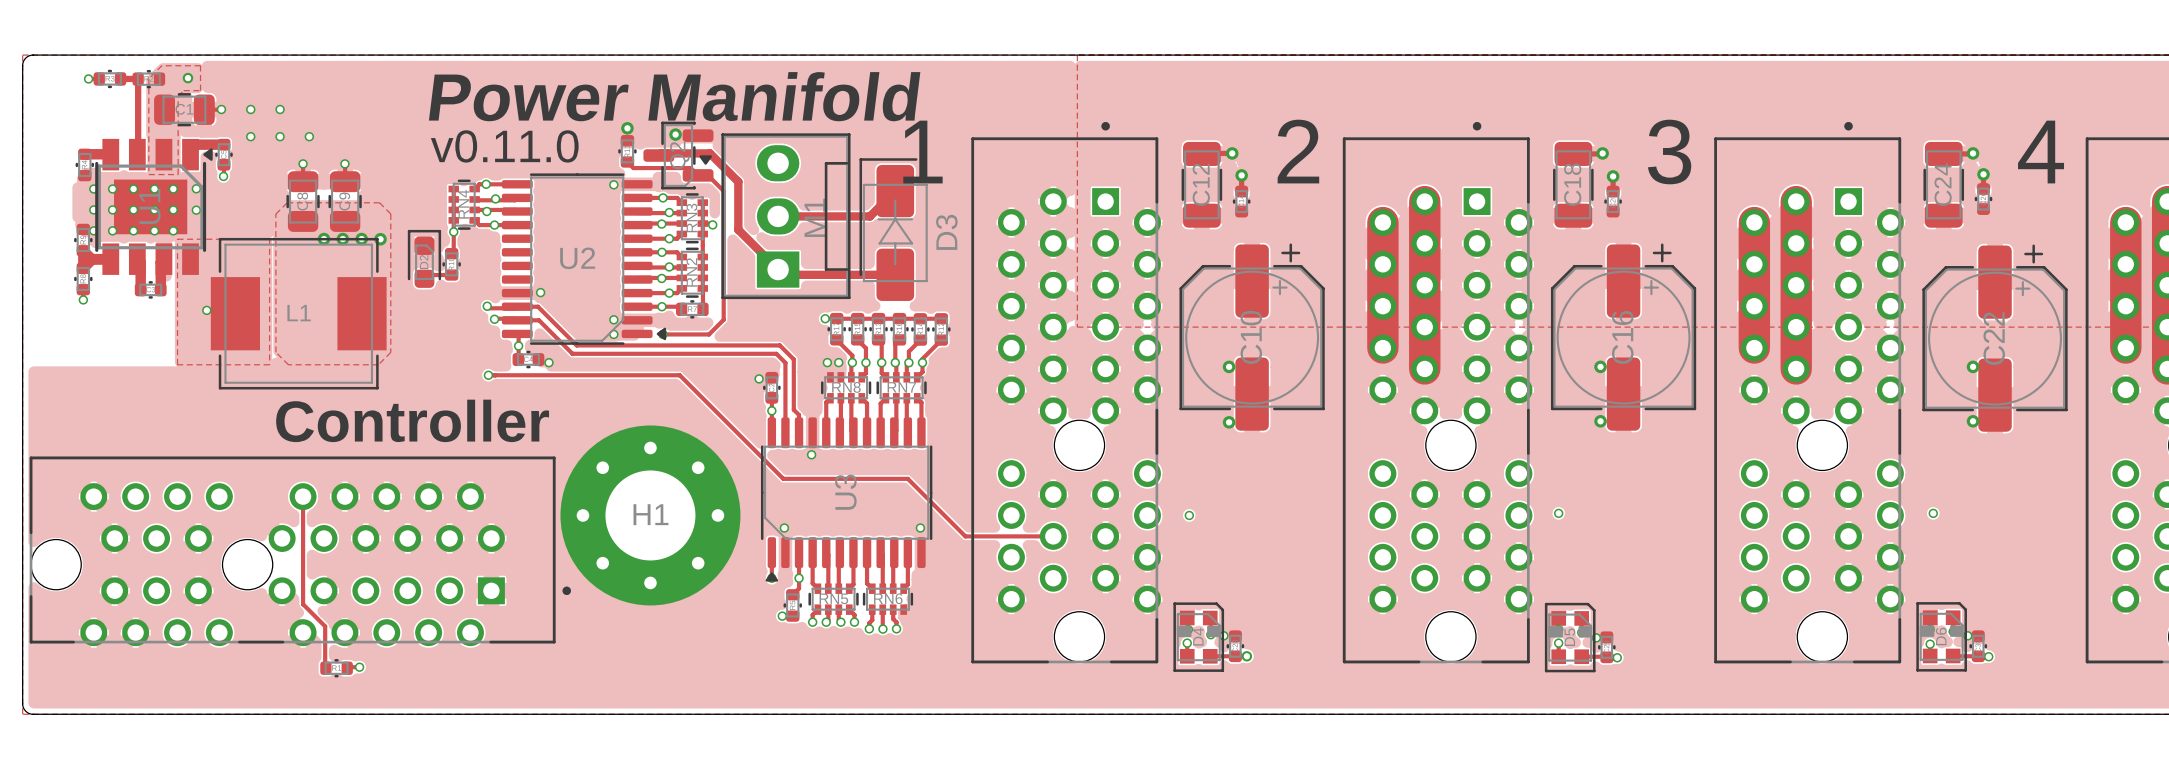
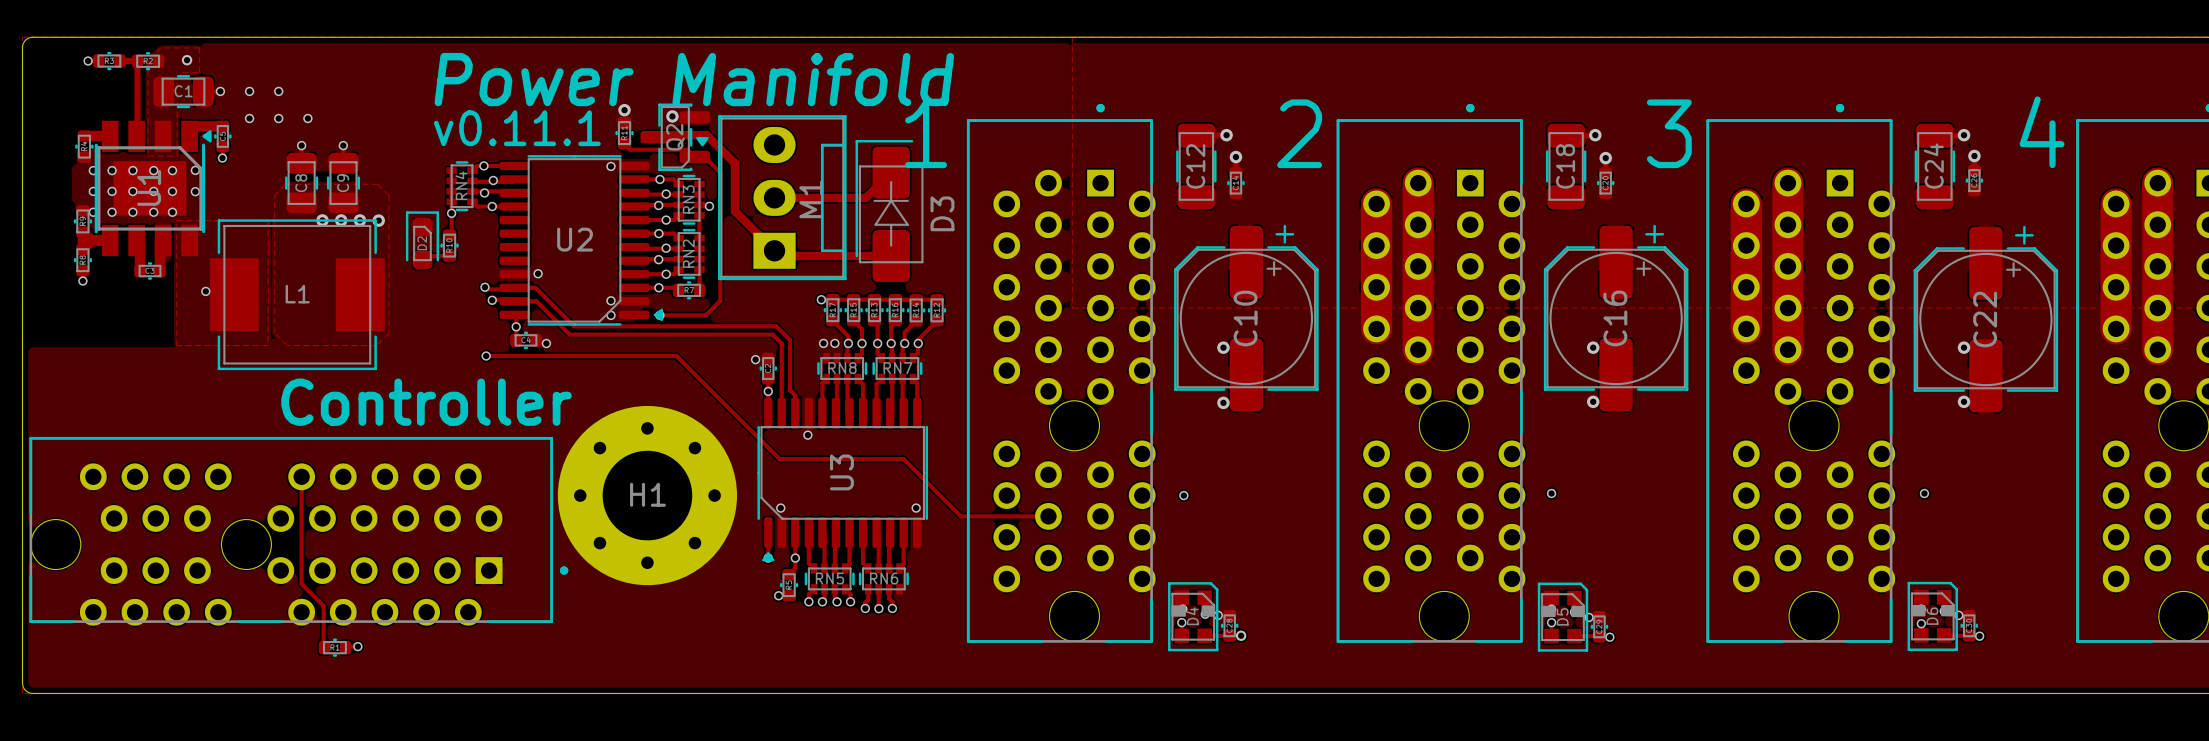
text: v0.11.0 (504, 146) -> v0.11.1 (517, 128)

